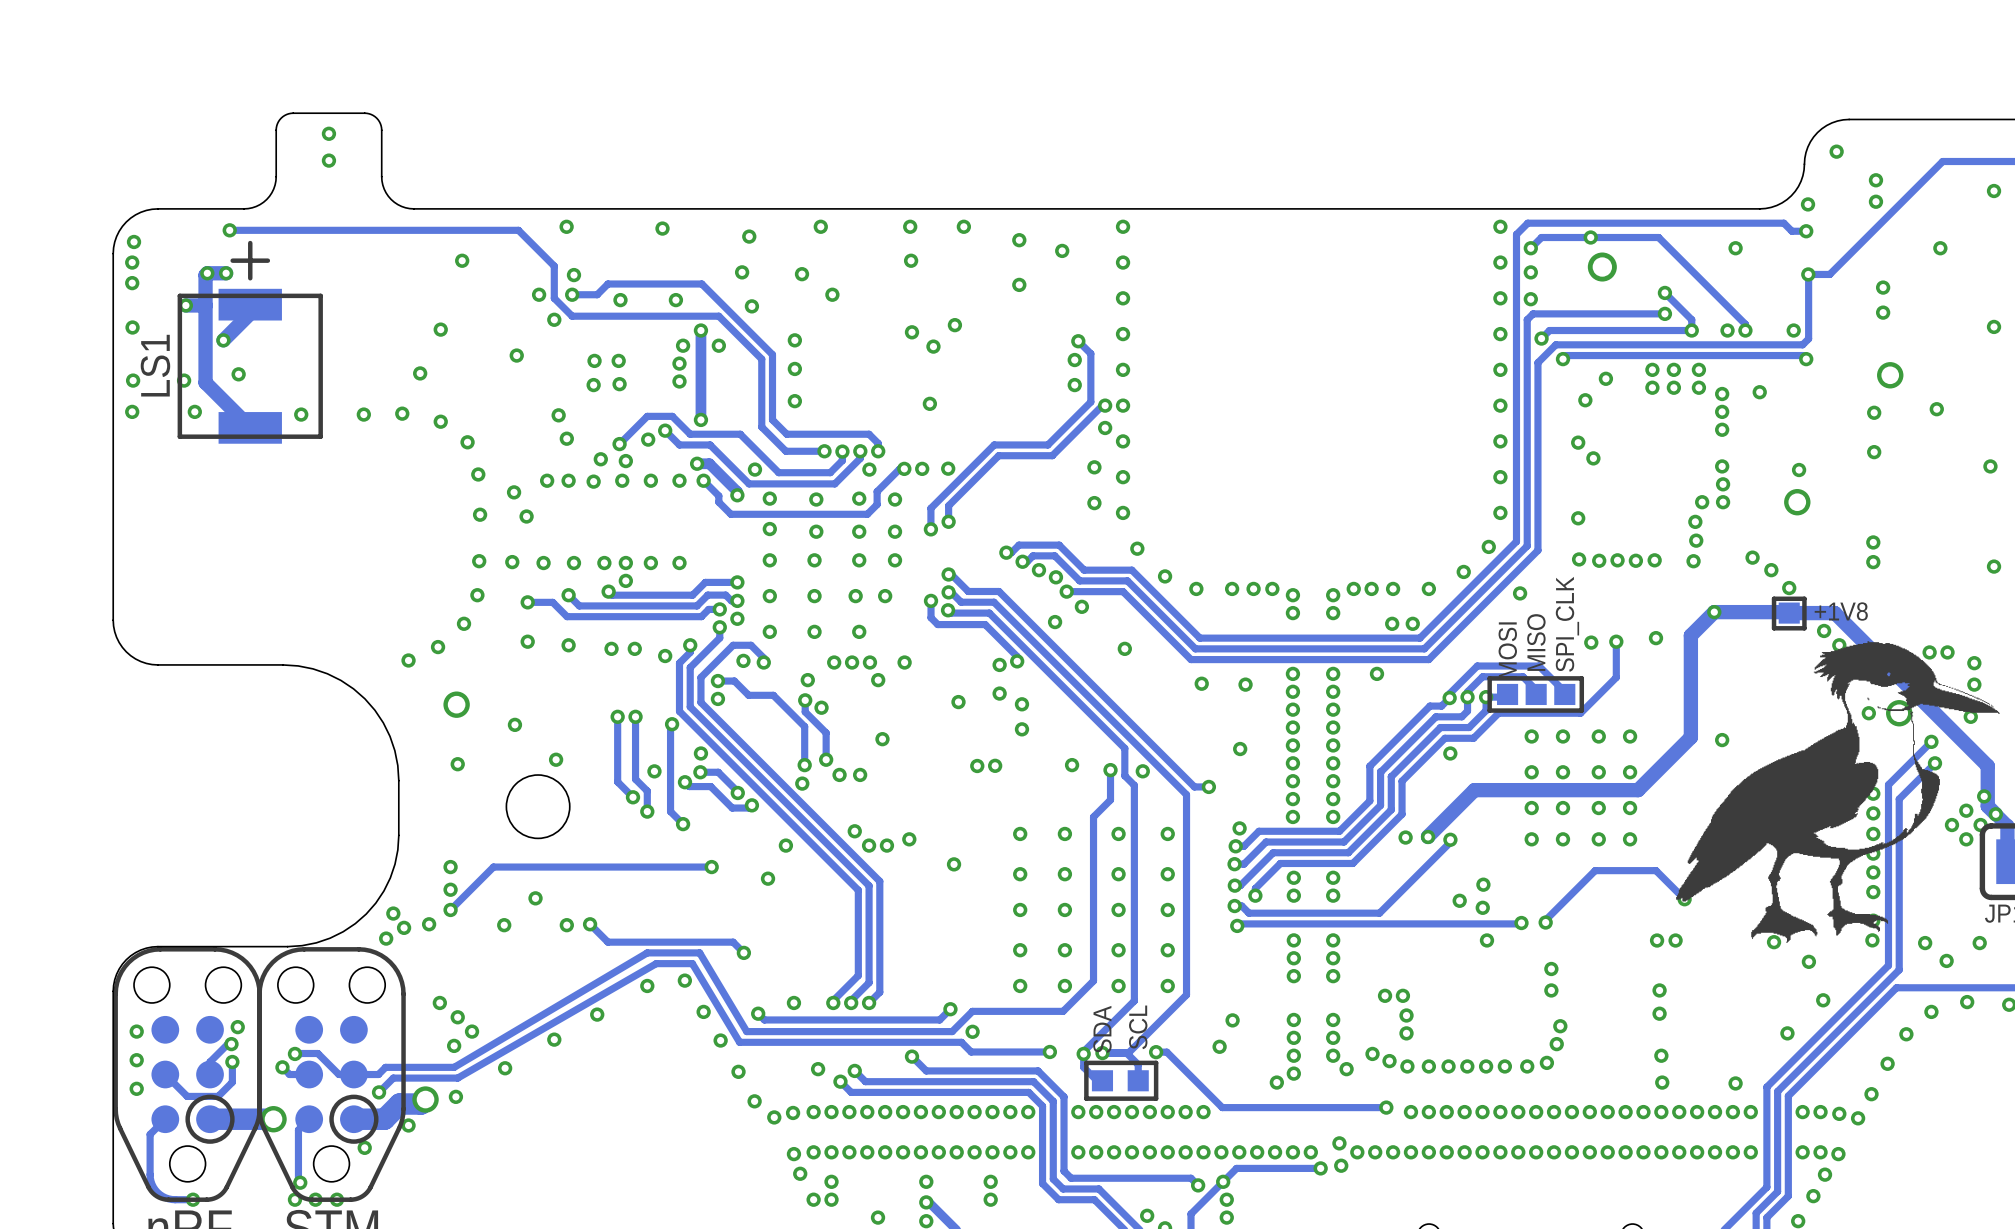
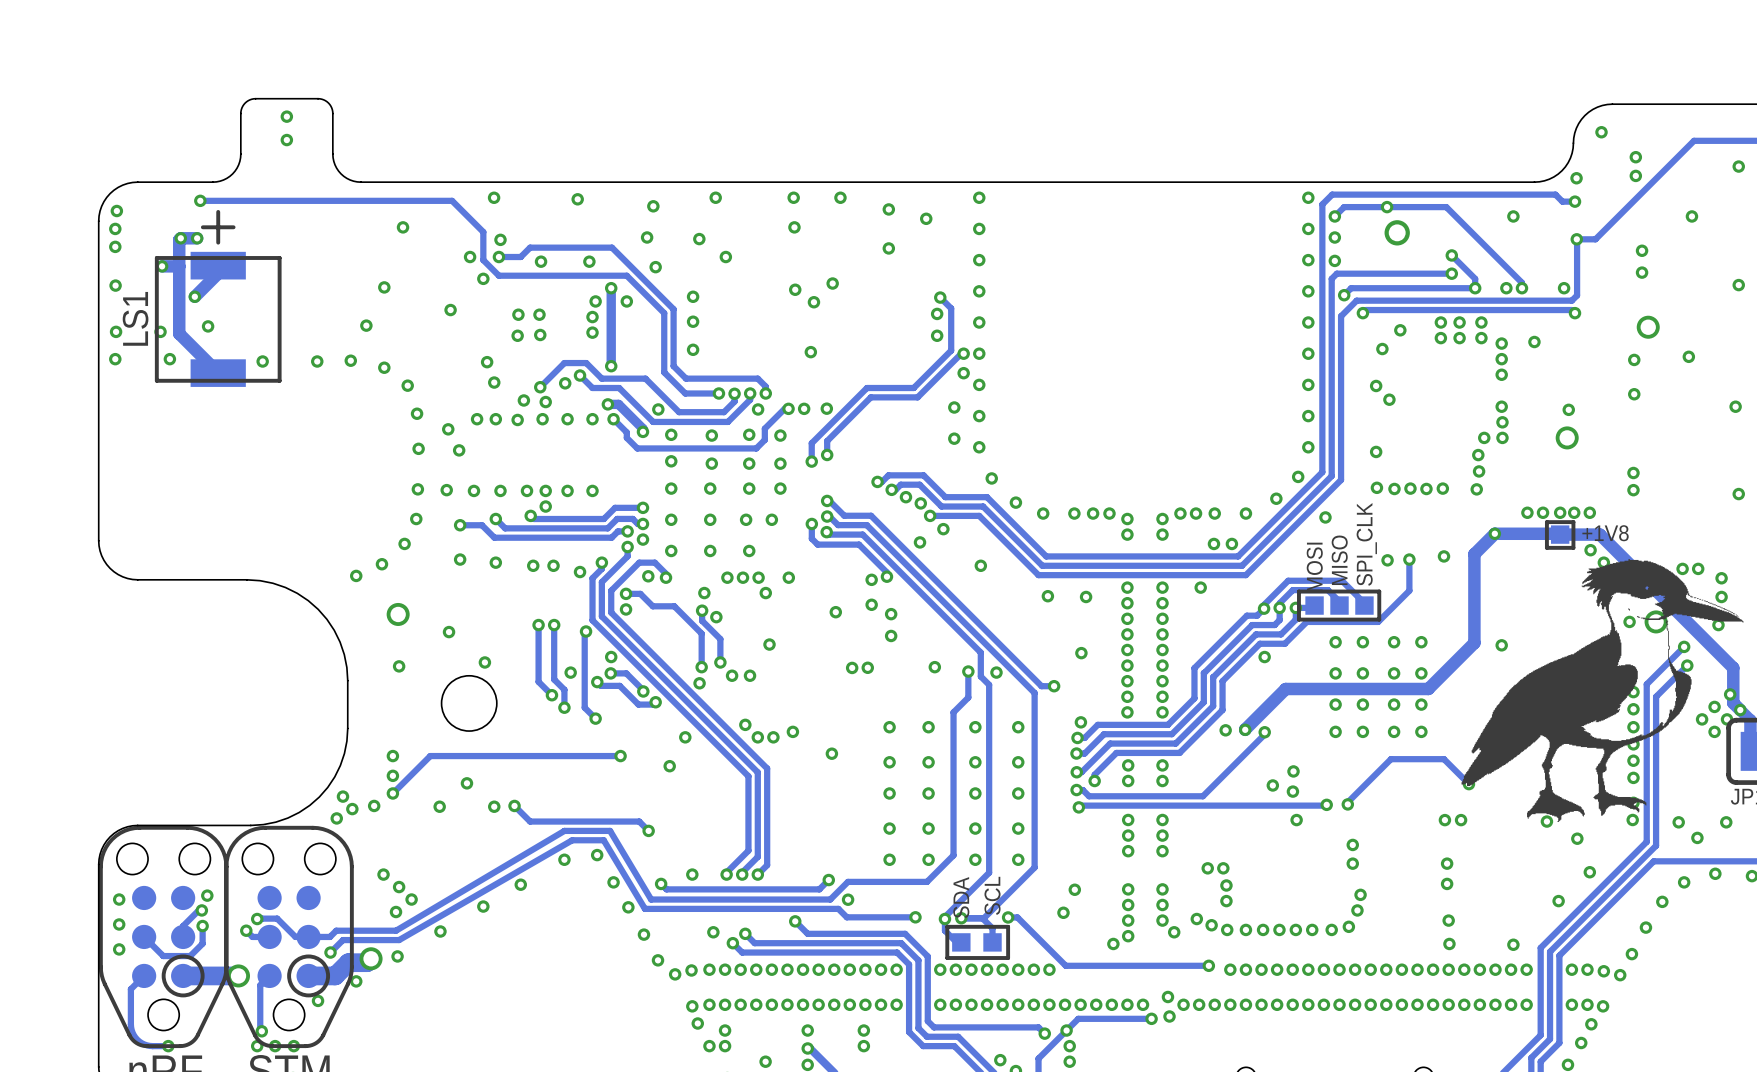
via: (1752, 557) -> none
via: (1771, 570) -> none
via: none -> (1527, 512)
via: none -> (1543, 512)
via: none -> (1574, 512)
via: none -> (1589, 512)

